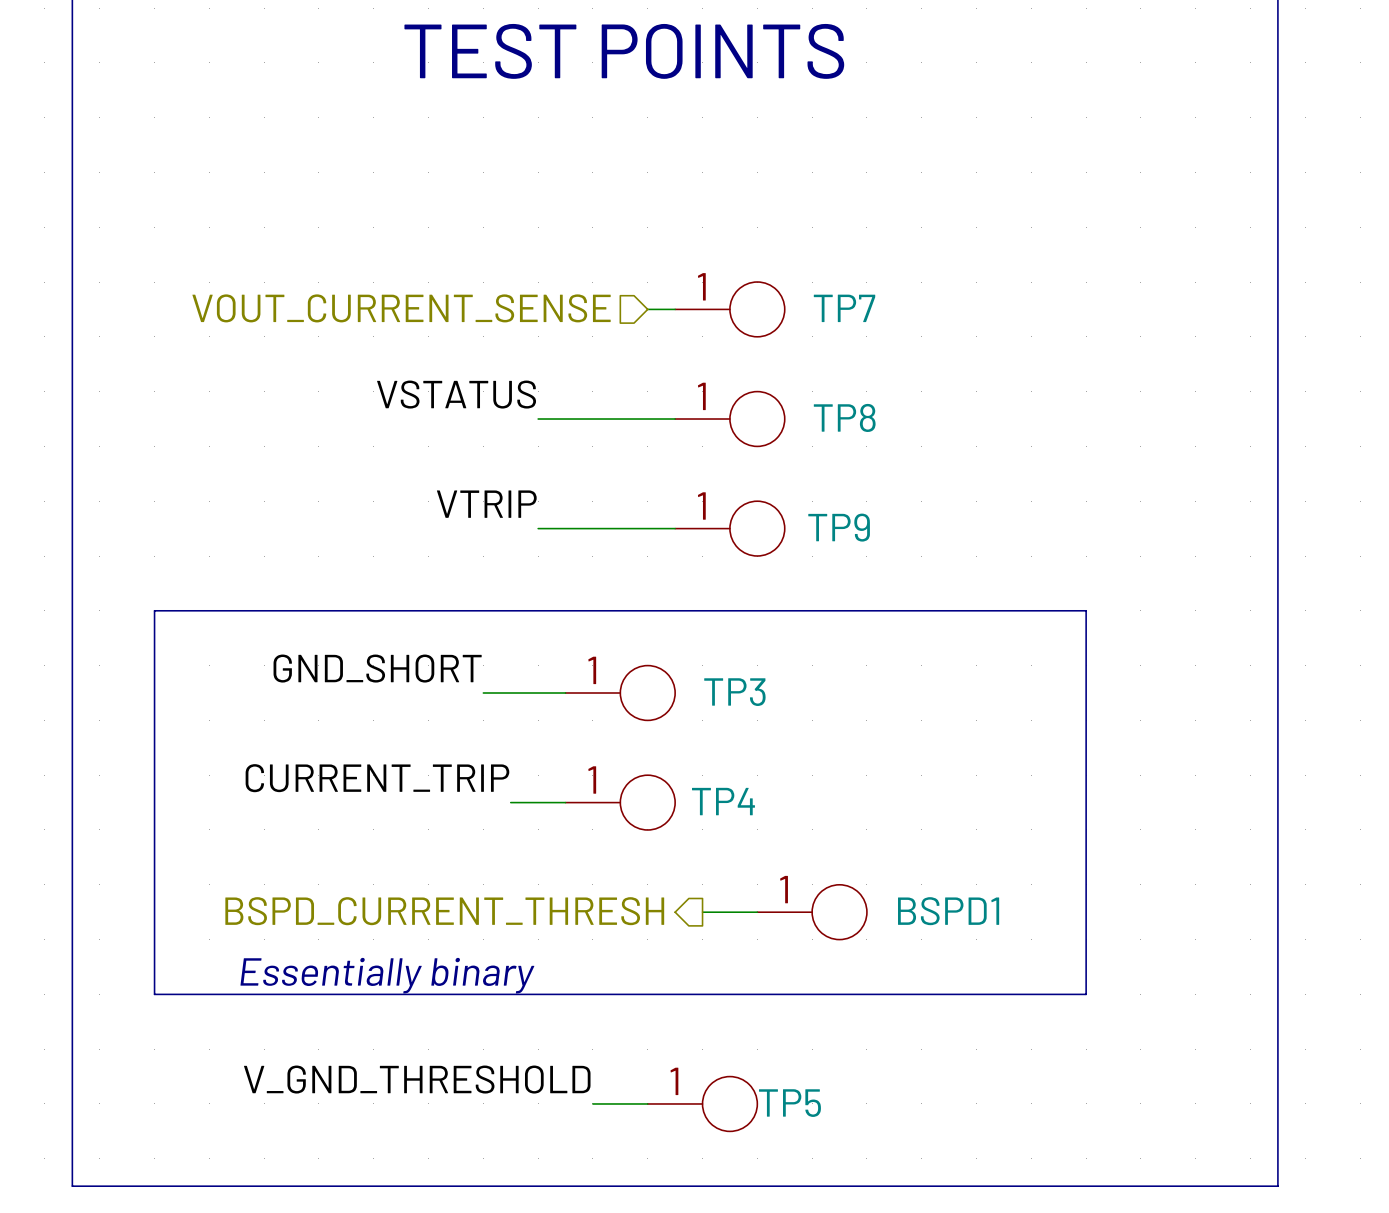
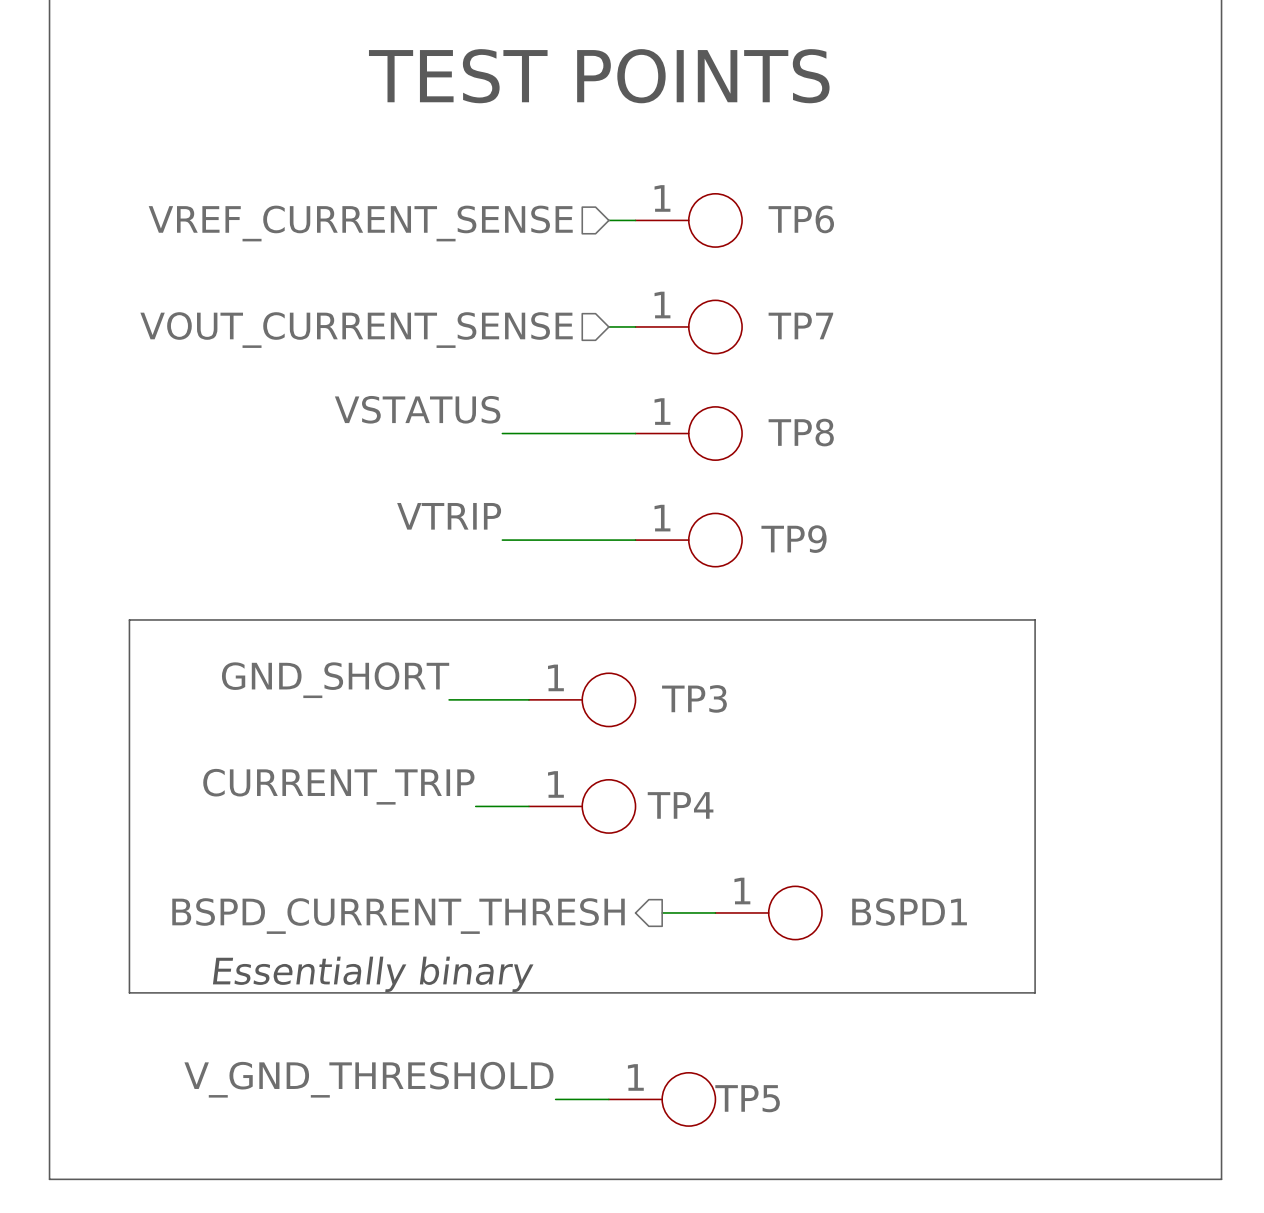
hierarchical label: none -> VREF_CURRENT_SENSE (360, 223)
wire: none -> (608, 220) (635, 220)
TP6: none -> (688, 220)

